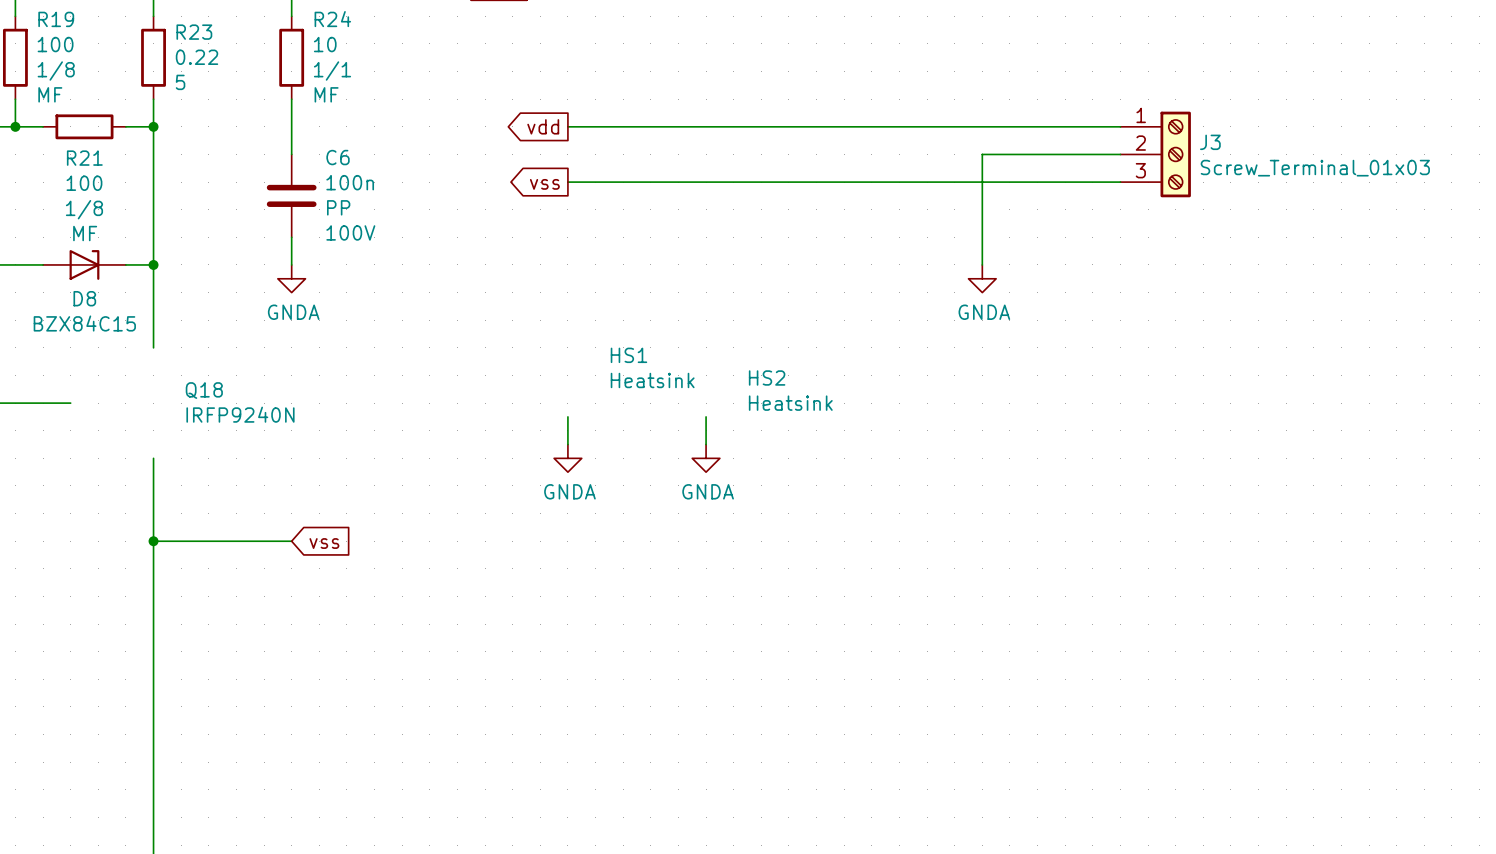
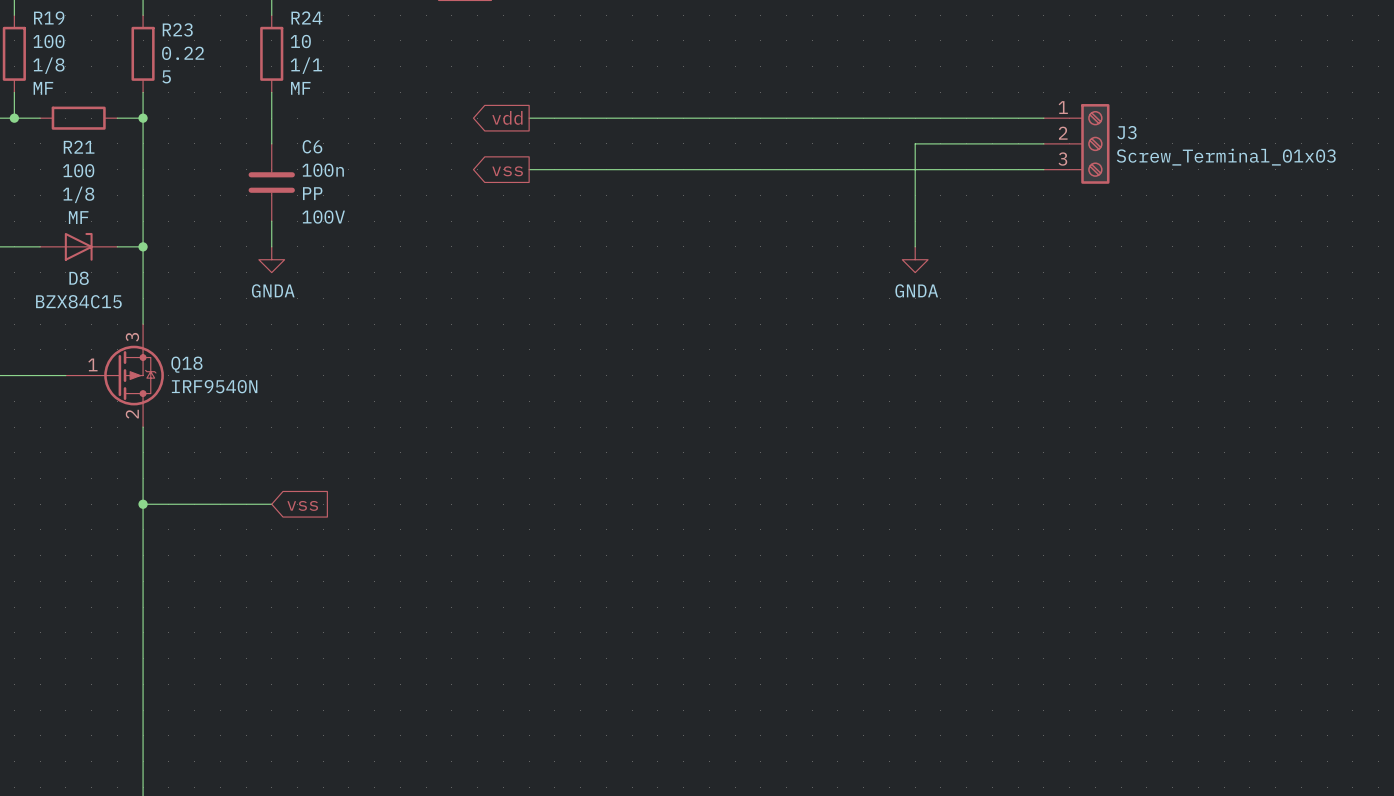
HS1: Heatsink (652, 367) -> none
Q18 symbol: [185, 382, 295, 423] -> [65, 324, 164, 428]
HS2: Heatsink (790, 390) -> none
Q18 value: IRFP9240N (240, 414) -> IRF9540N (214, 386)
wire: (567, 416) (567, 444) -> none
wire: (706, 416) (706, 444) -> none
power symbol: GNDA (567, 458) -> none
power symbol: GNDA (706, 458) -> none

